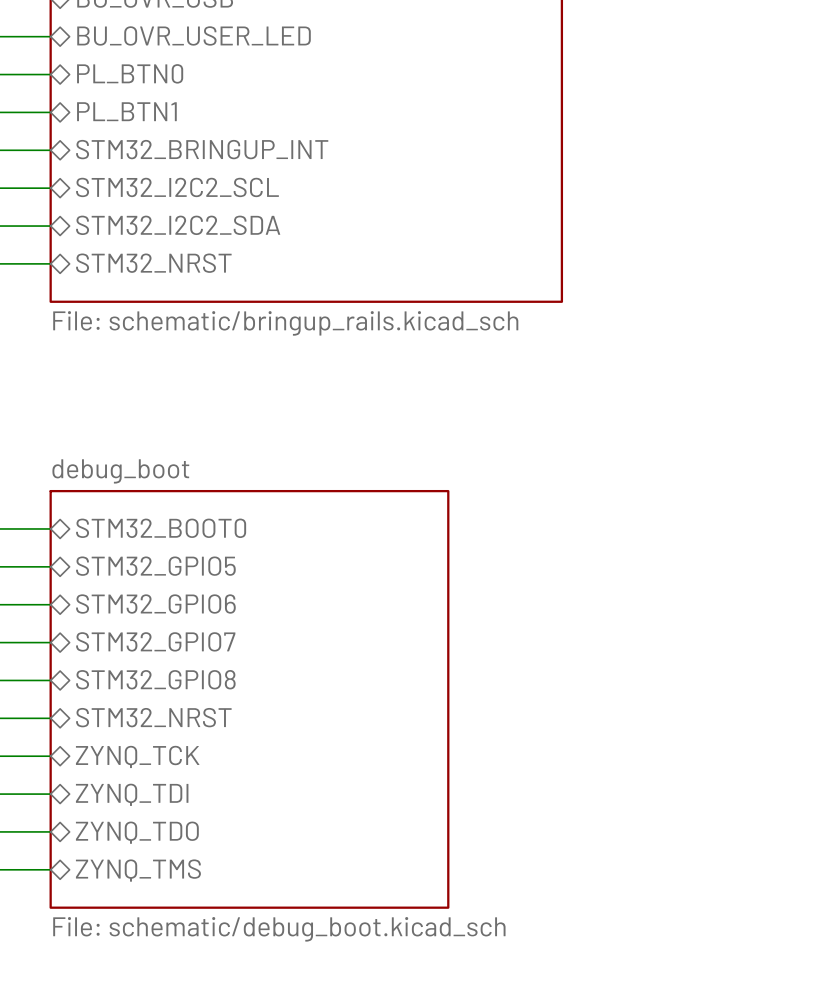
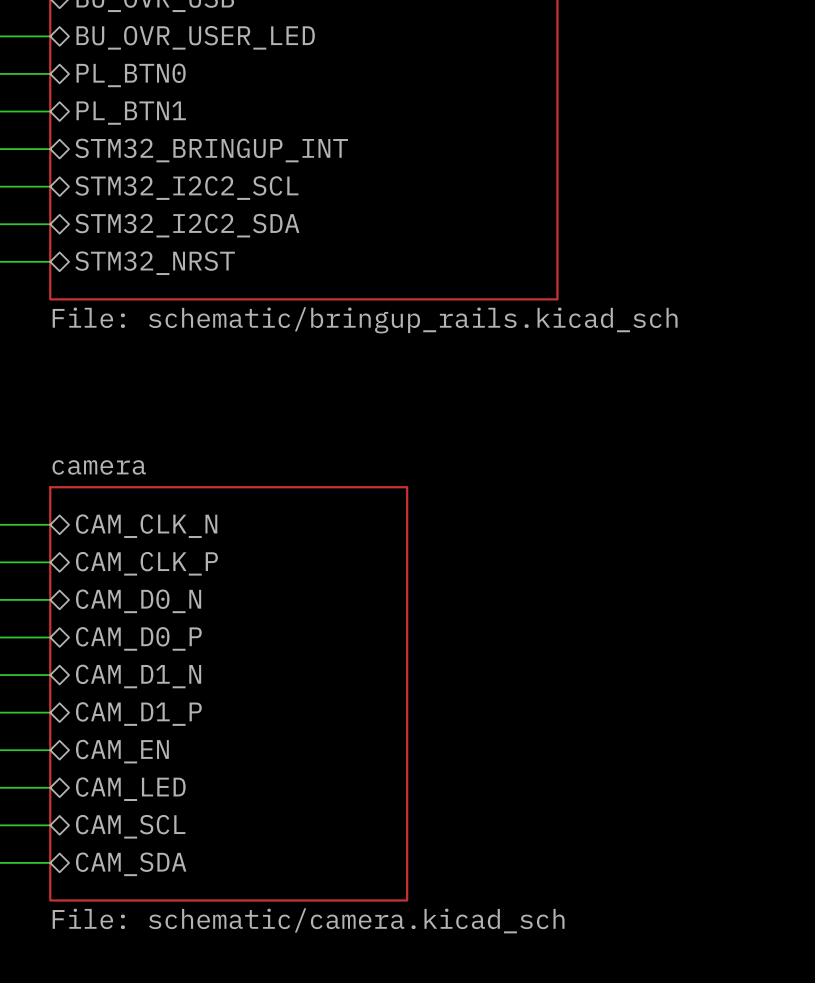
sheet pin: STM32_BOOT0 (161, 528) -> CAM_CLK_N (146, 526)
sheet pin: STM32_GPIO5 (155, 566) -> CAM_CLK_P (146, 563)
sheet pin: STM32_GPIO6 (155, 604) -> CAM_D0_N (138, 601)
sheet pin: STM32_GPIO7 (155, 641) -> CAM_D0_P (138, 638)
sheet pin: STM32_GPIO8 (155, 679) -> CAM_D1_N (138, 676)
sheet camera: none -> File: schematic/camera.kicad_sch (228, 693)
sheet debug_boot: File: schematic/debug_boot.kicad_sch (249, 699) -> none
sheet pin: STM32_NRST (153, 717) -> CAM_D1_P (138, 714)
sheet pin: ZYNQ_TCK (137, 756) -> CAM_EN (122, 751)
sheet pin: ZYNQ_TDI (132, 794) -> CAM_LED (130, 789)
sheet pin: ZYNQ_TDO (137, 832) -> CAM_SCL (130, 826)
sheet pin: ZYNQ_TMS (138, 870) -> CAM_SDA (131, 864)

